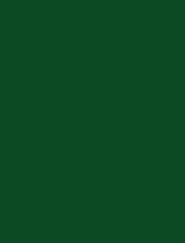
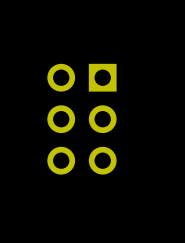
part: none -> (81, 119)

